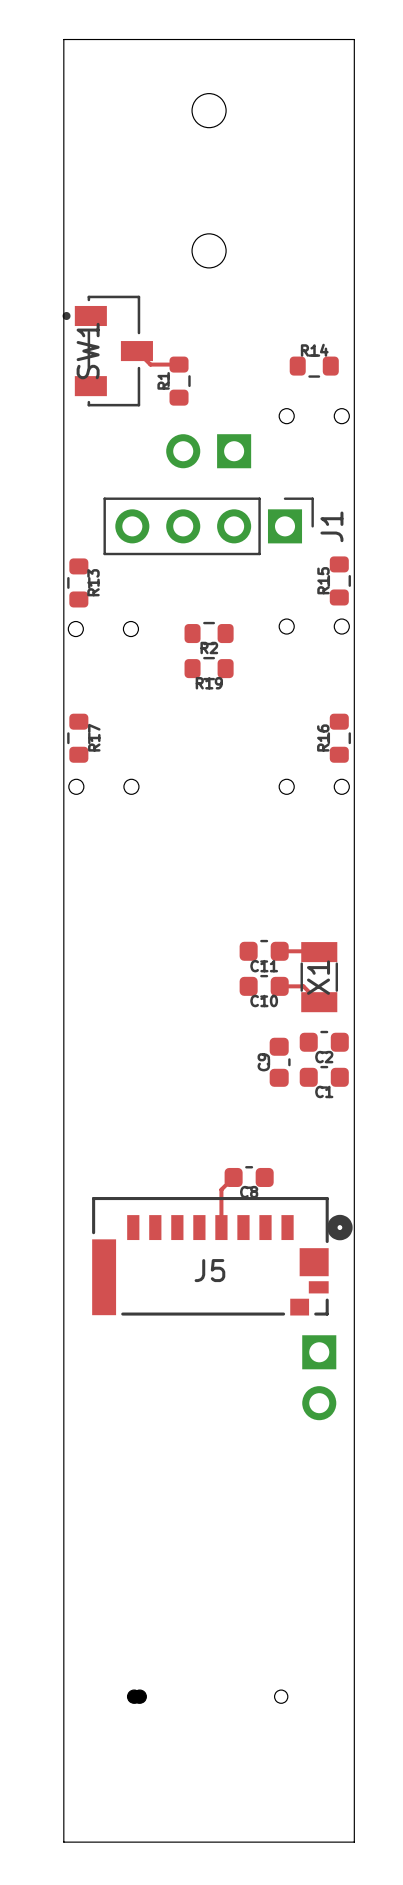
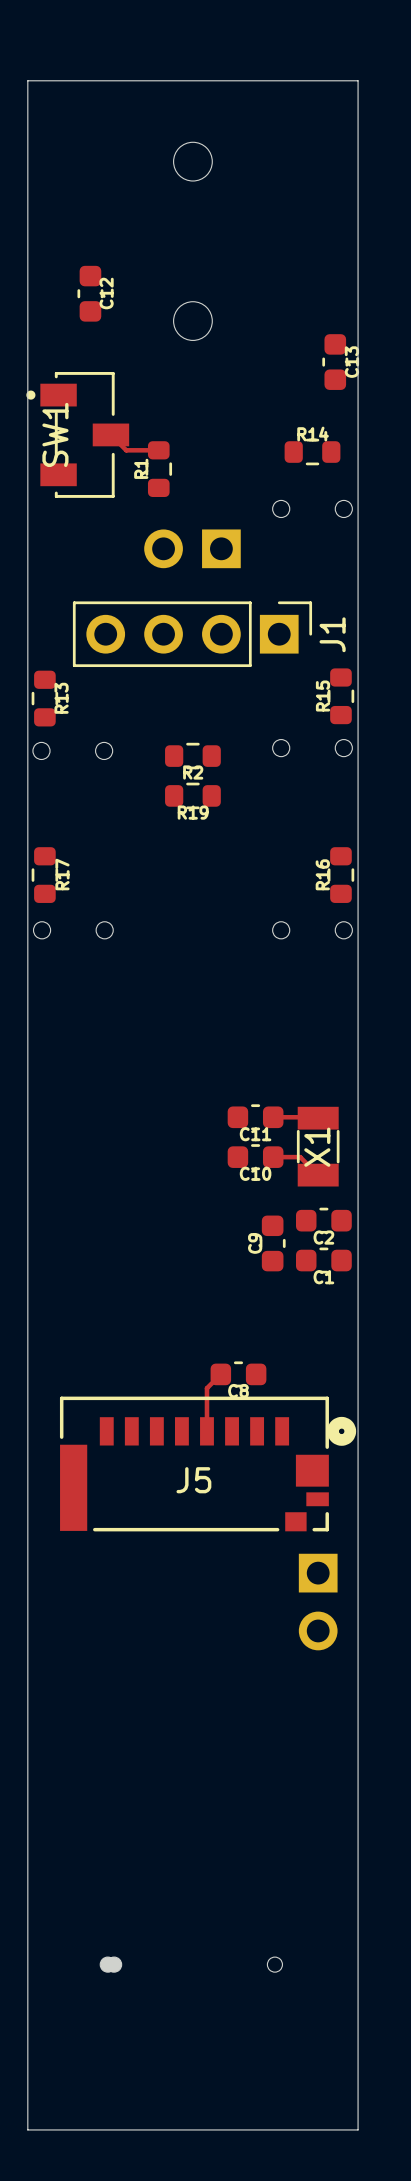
C12: none -> (90, 293)
C13: none -> (335, 362)

